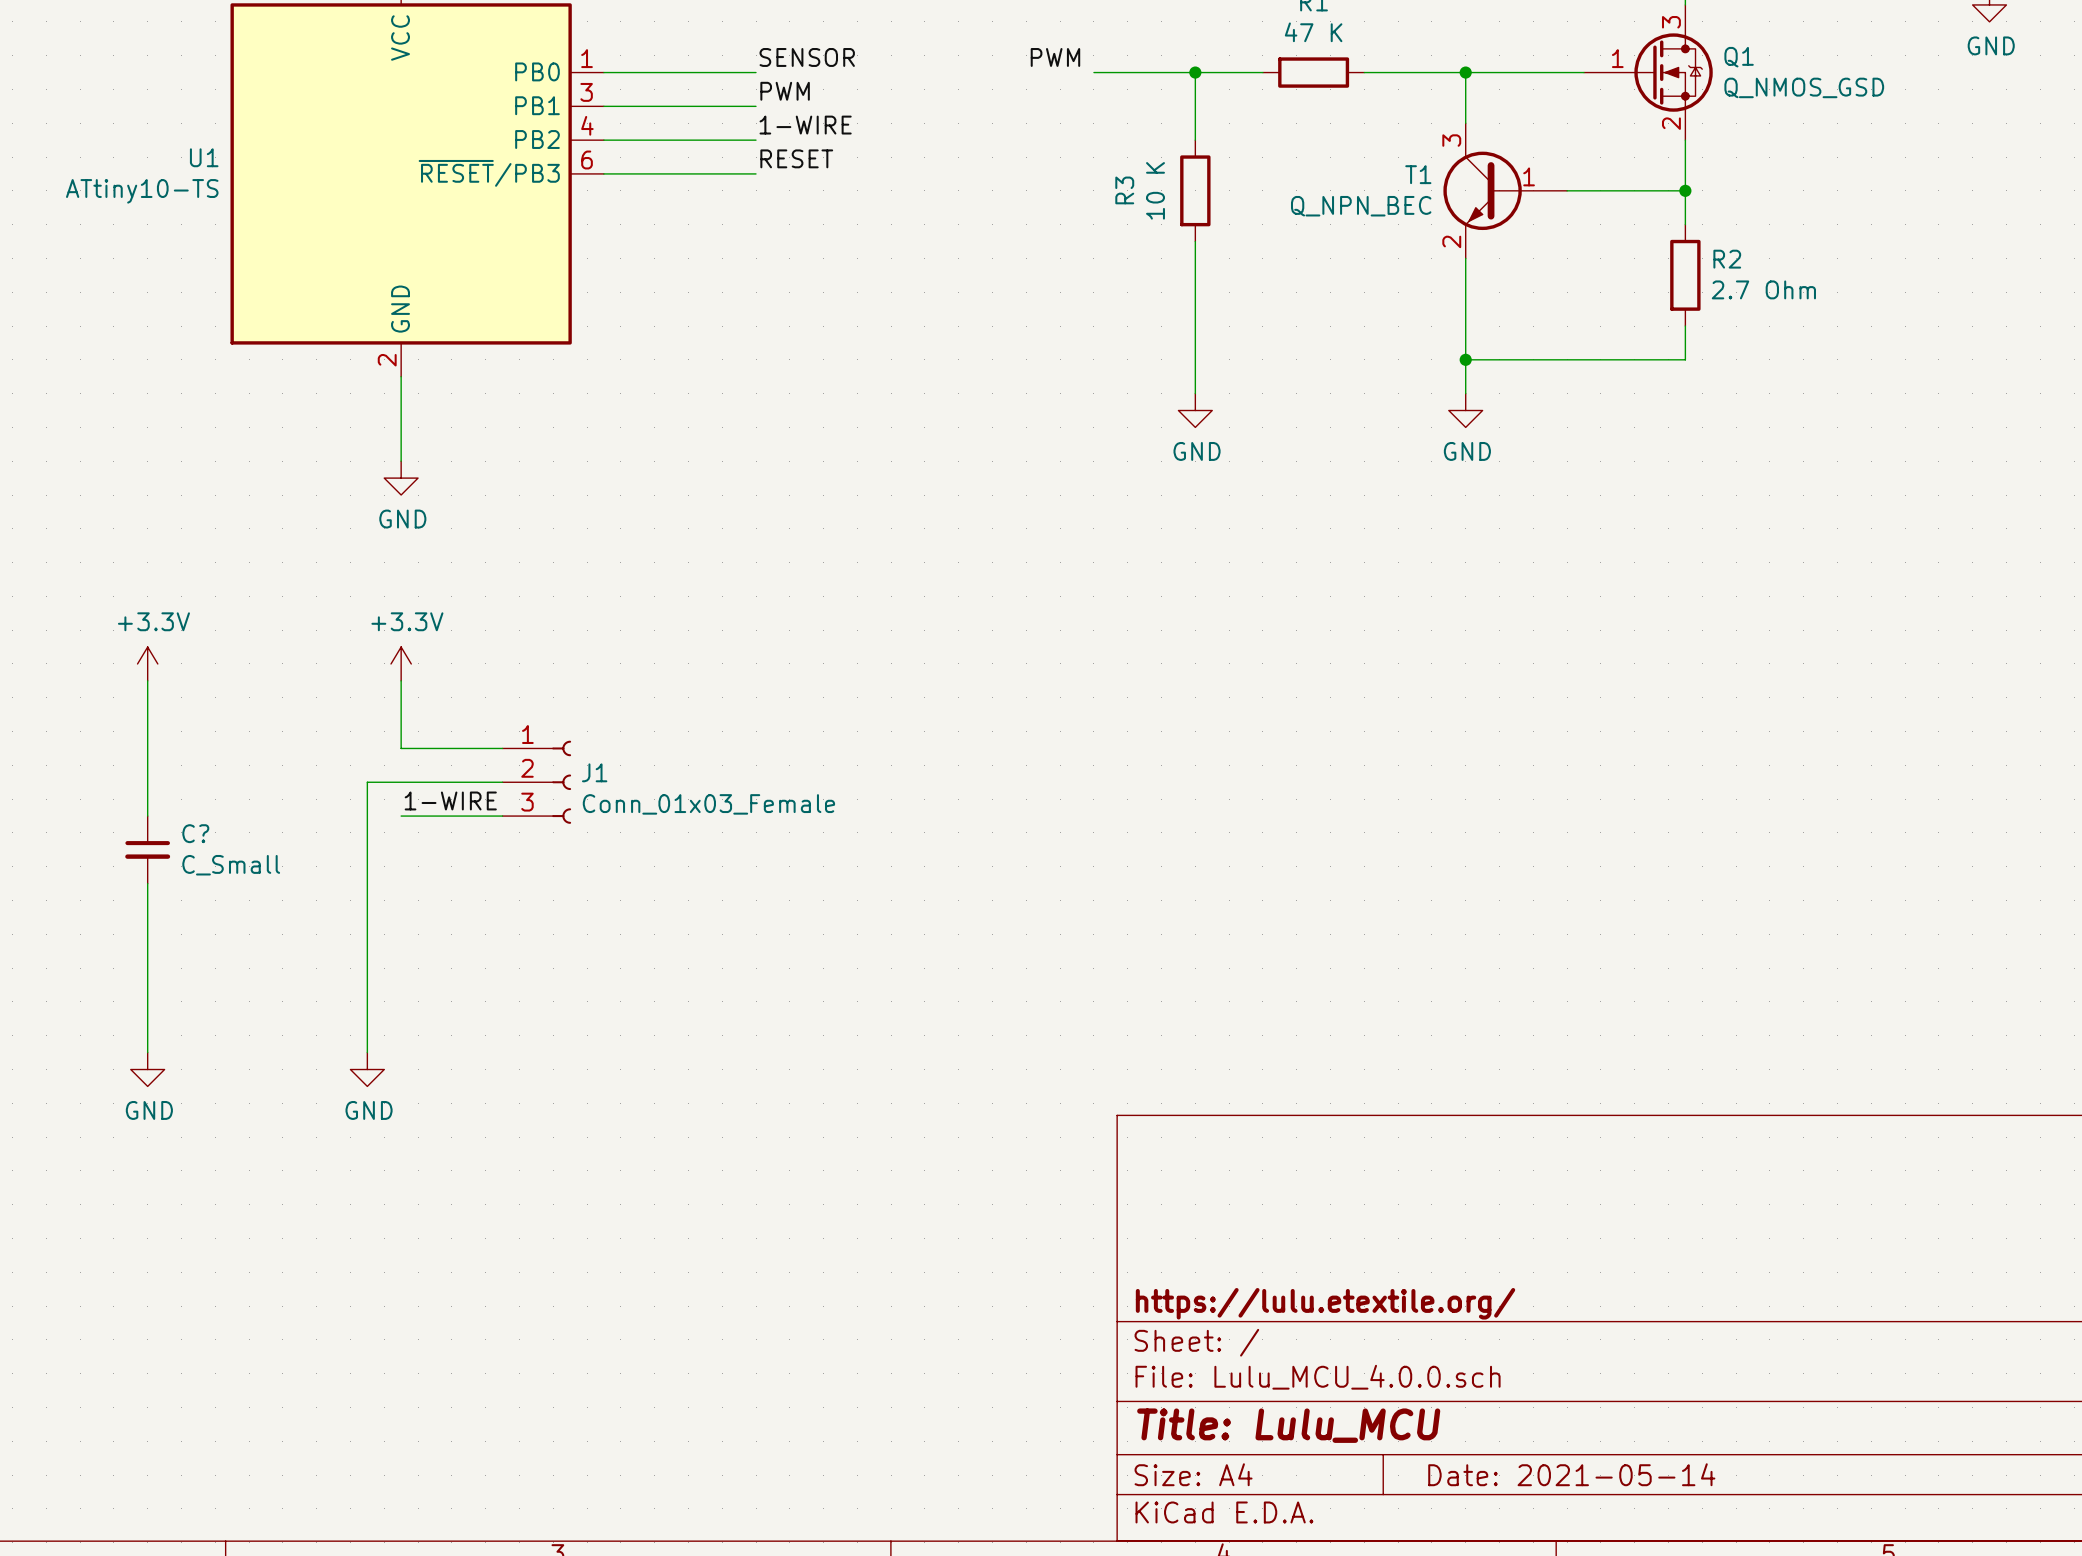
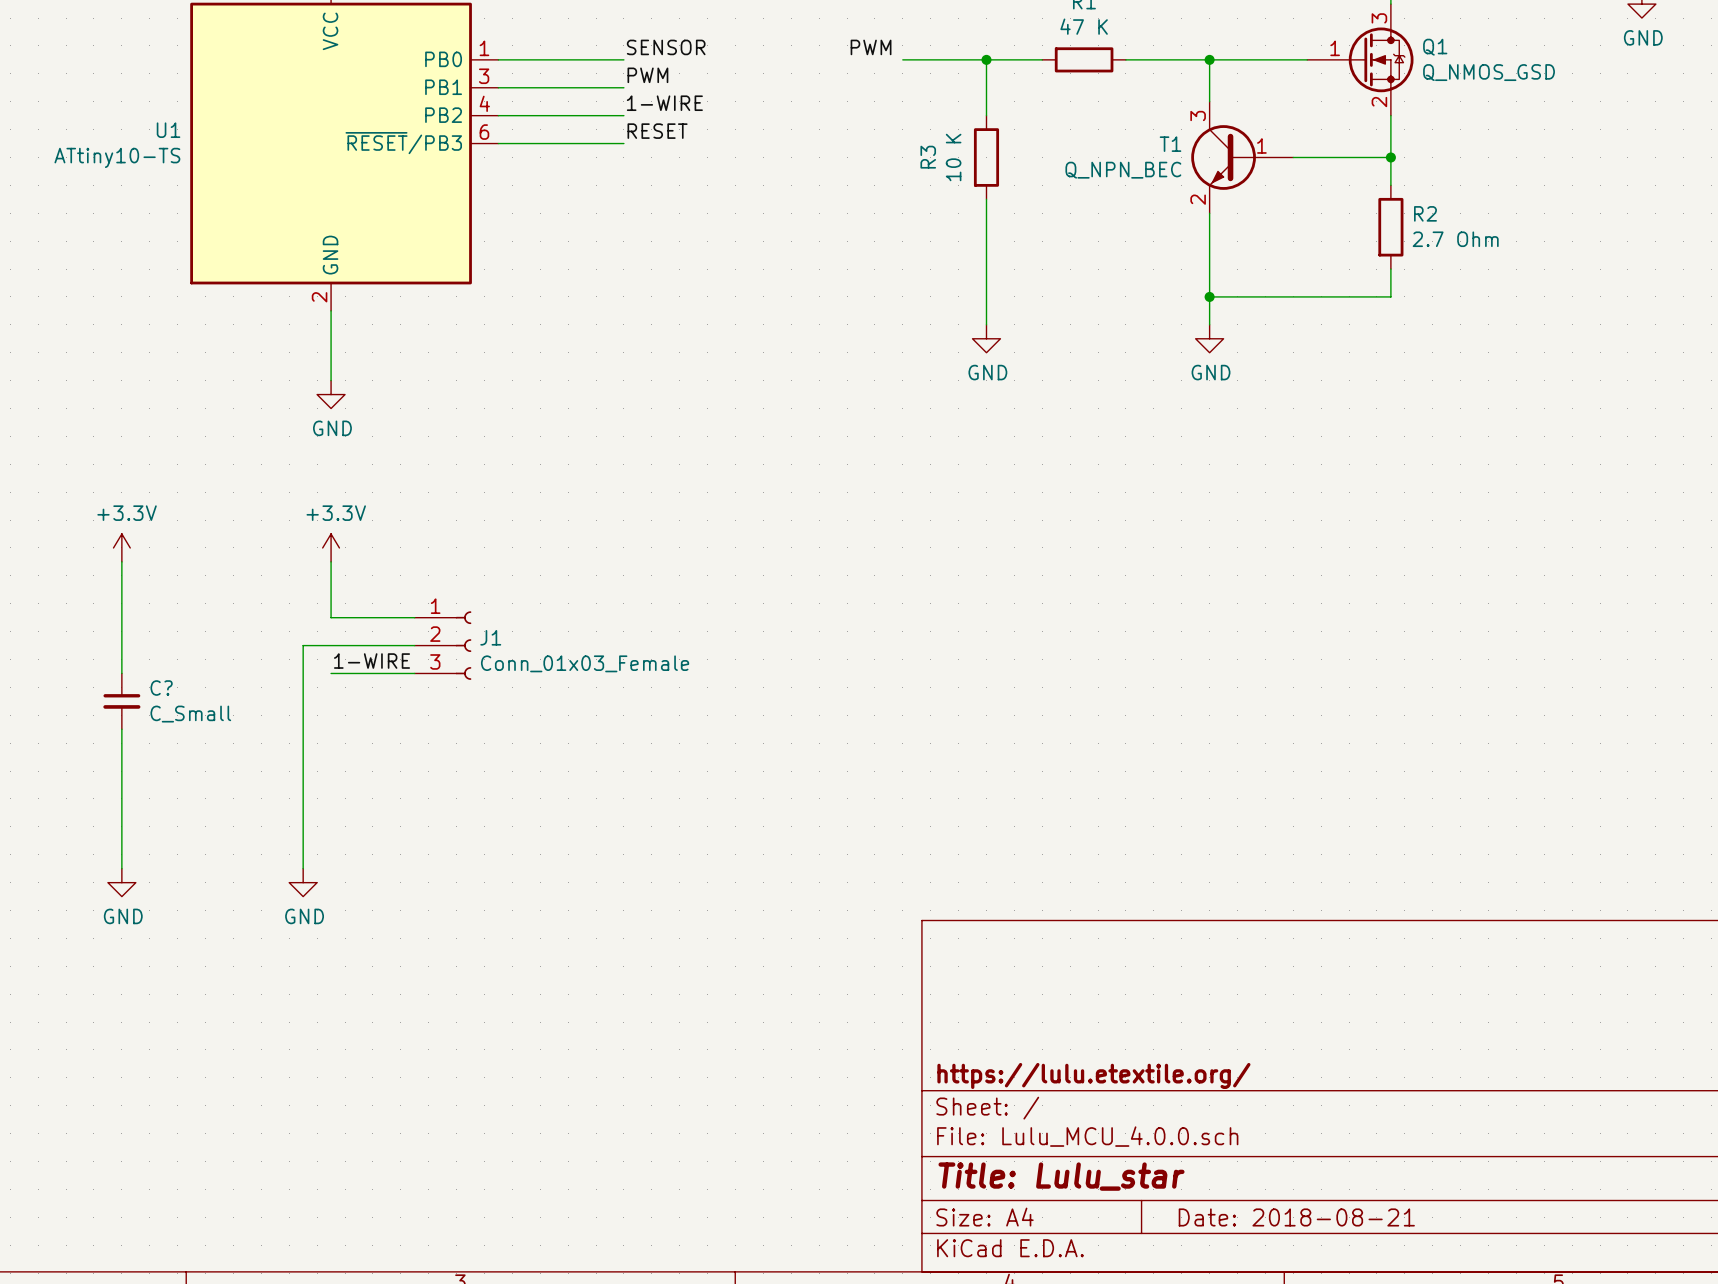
title block: Title: Lulu_MCU (1288, 1425) -> Title: Lulu_star (1061, 1176)
title block: Date: 2021-05-14 (1571, 1474) -> Date: 2018-08-21 (1296, 1217)

